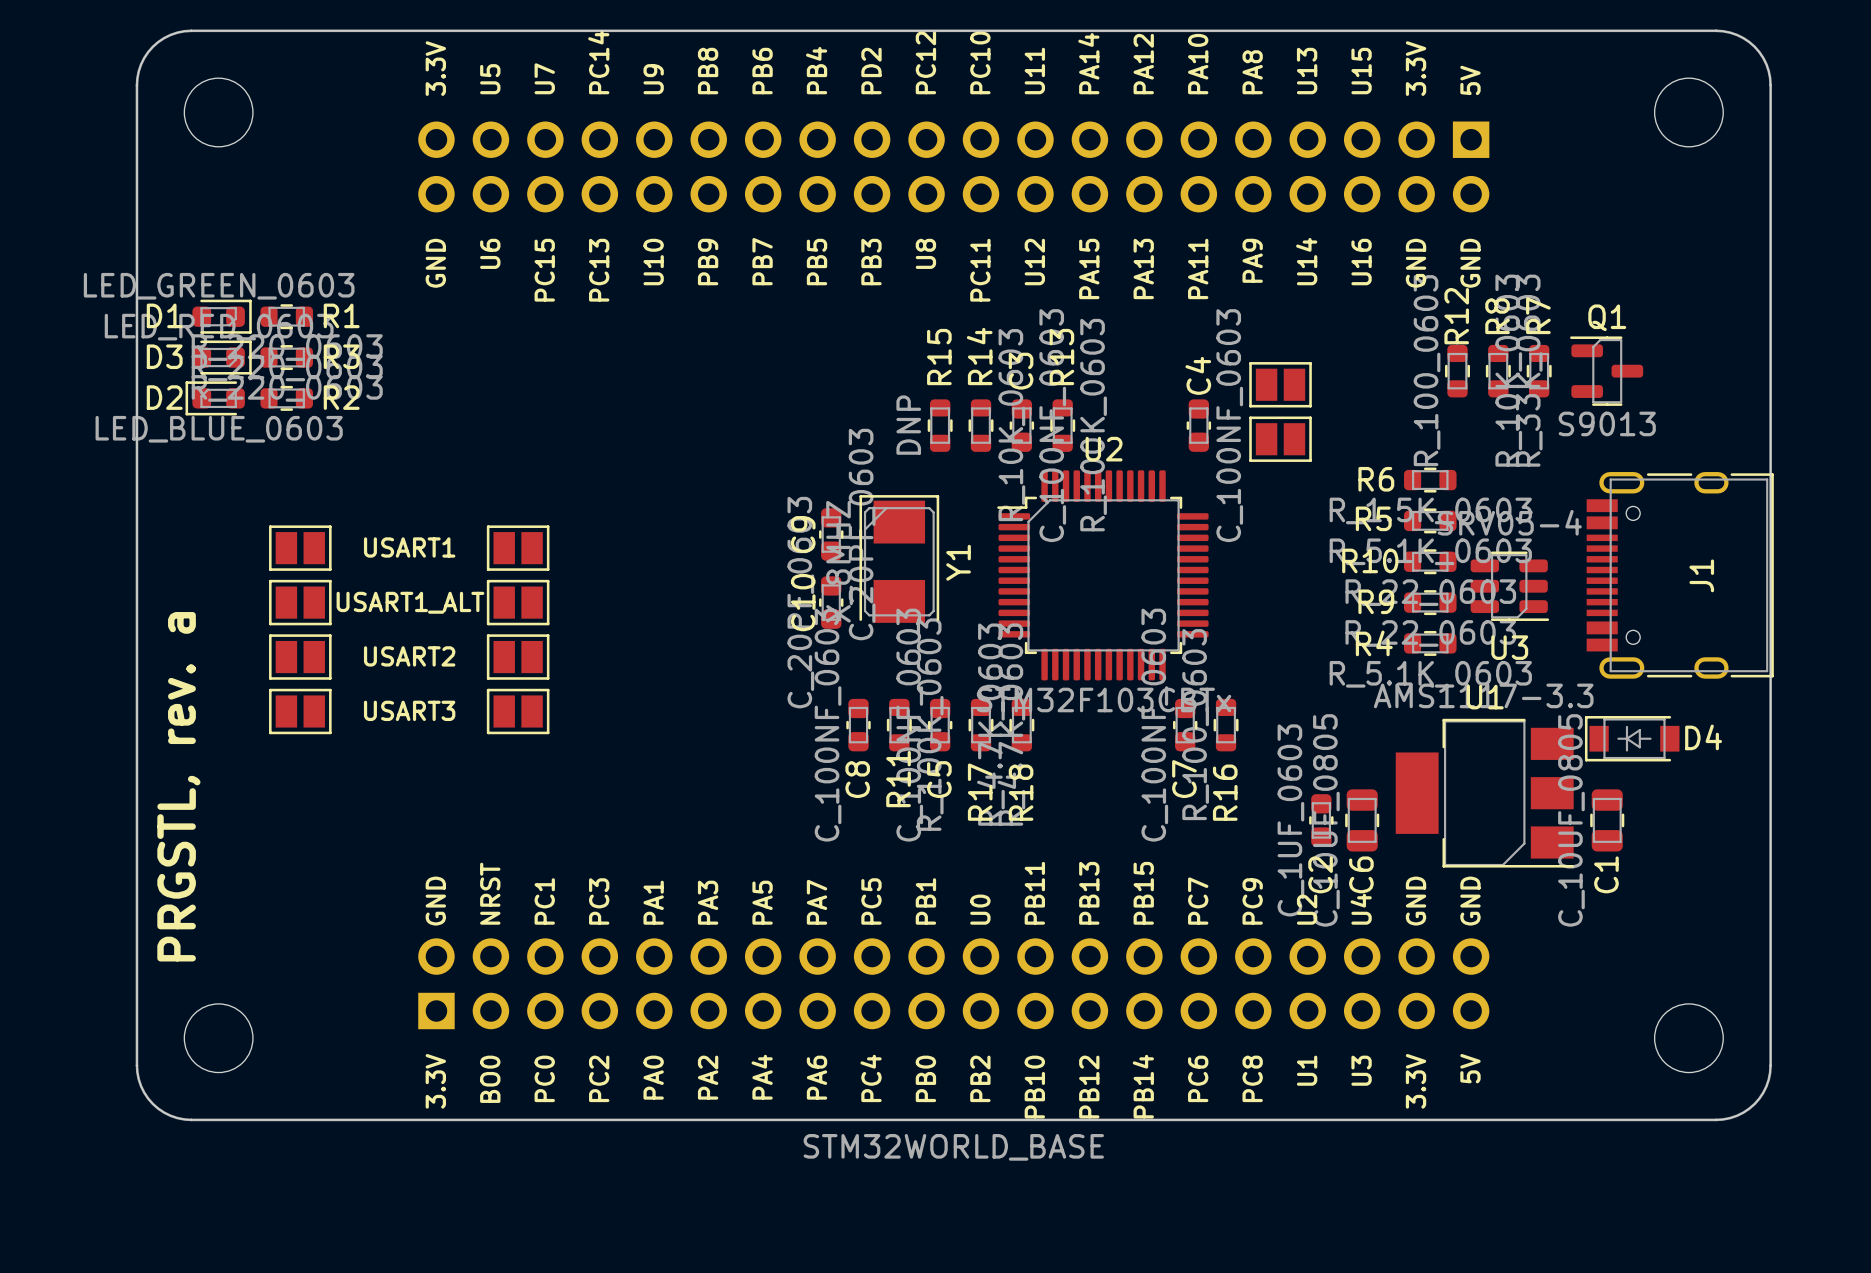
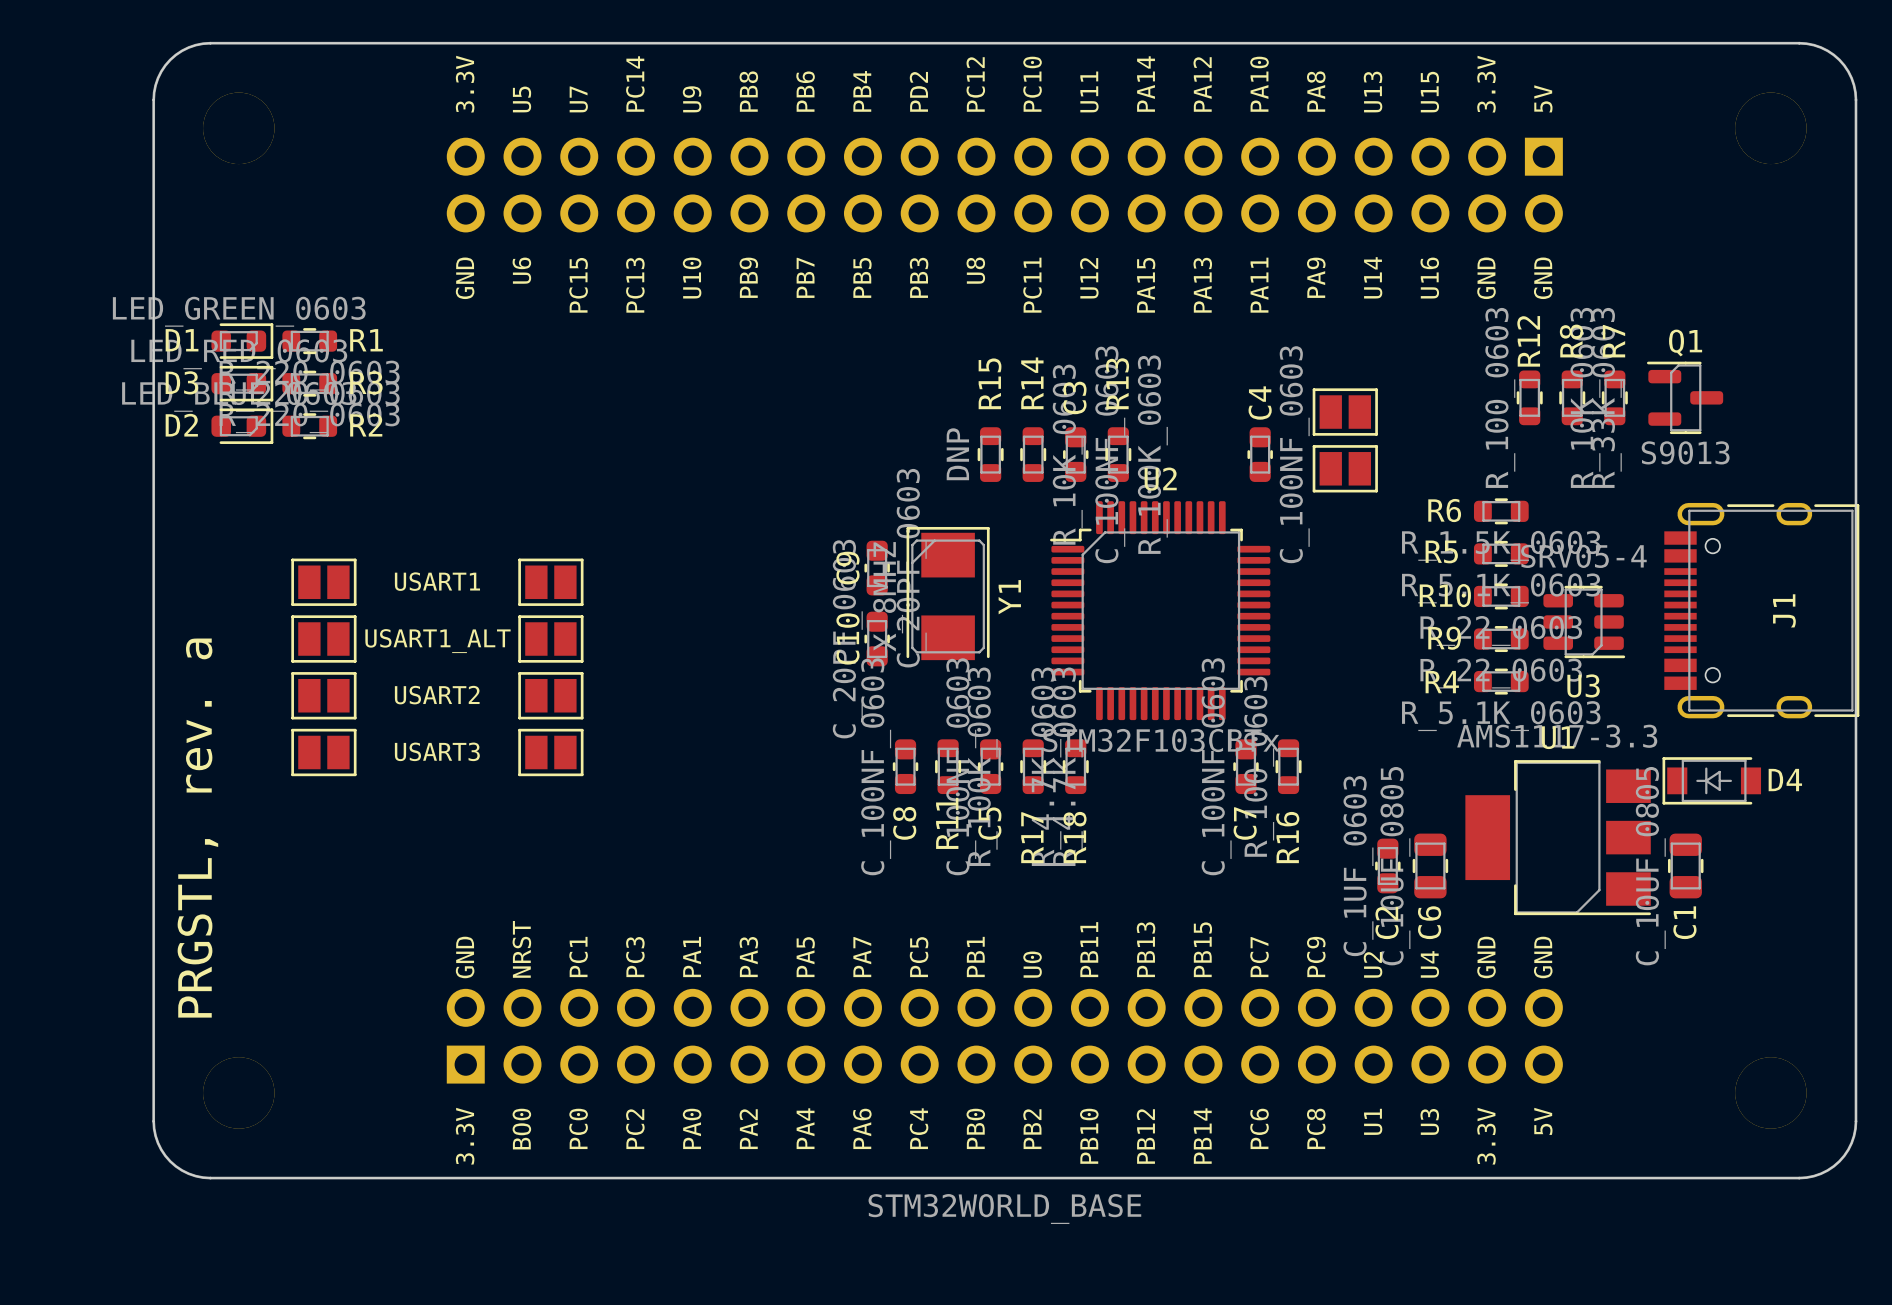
part footprint: [135, 29, 1772, 1122] -> [152, 41, 1858, 1180]
D2 rotation: 0° (215, 398) -> 180° (242, 426)

